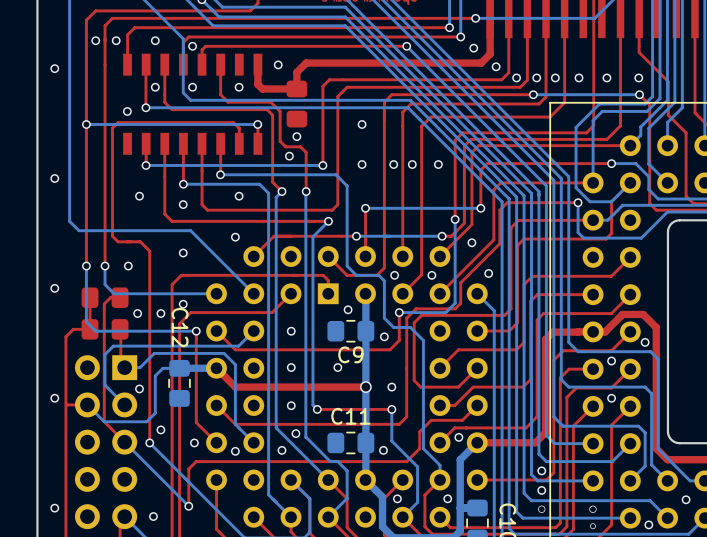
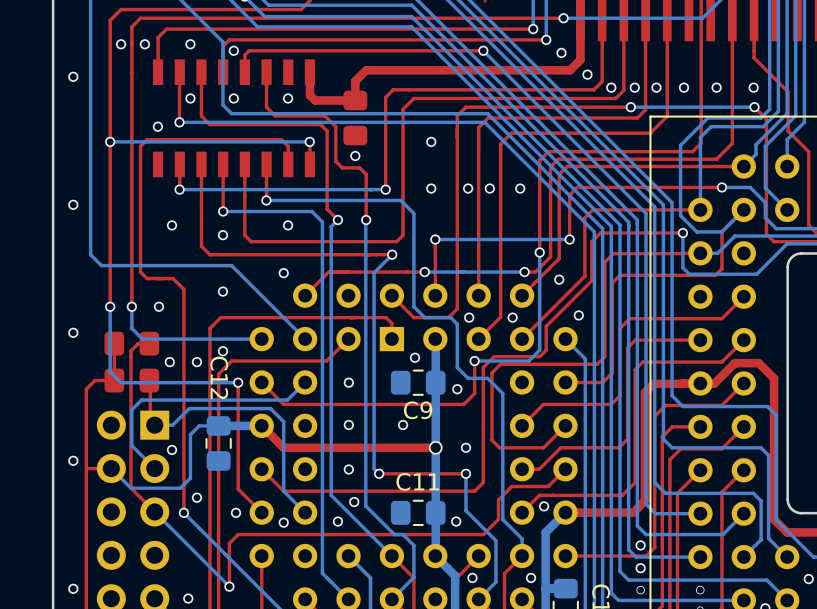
via: (278, 64) -> none
via: (289, 156) -> none
via: (645, 342) -> none
via: (611, 361) -> none
via: (611, 398) -> none

